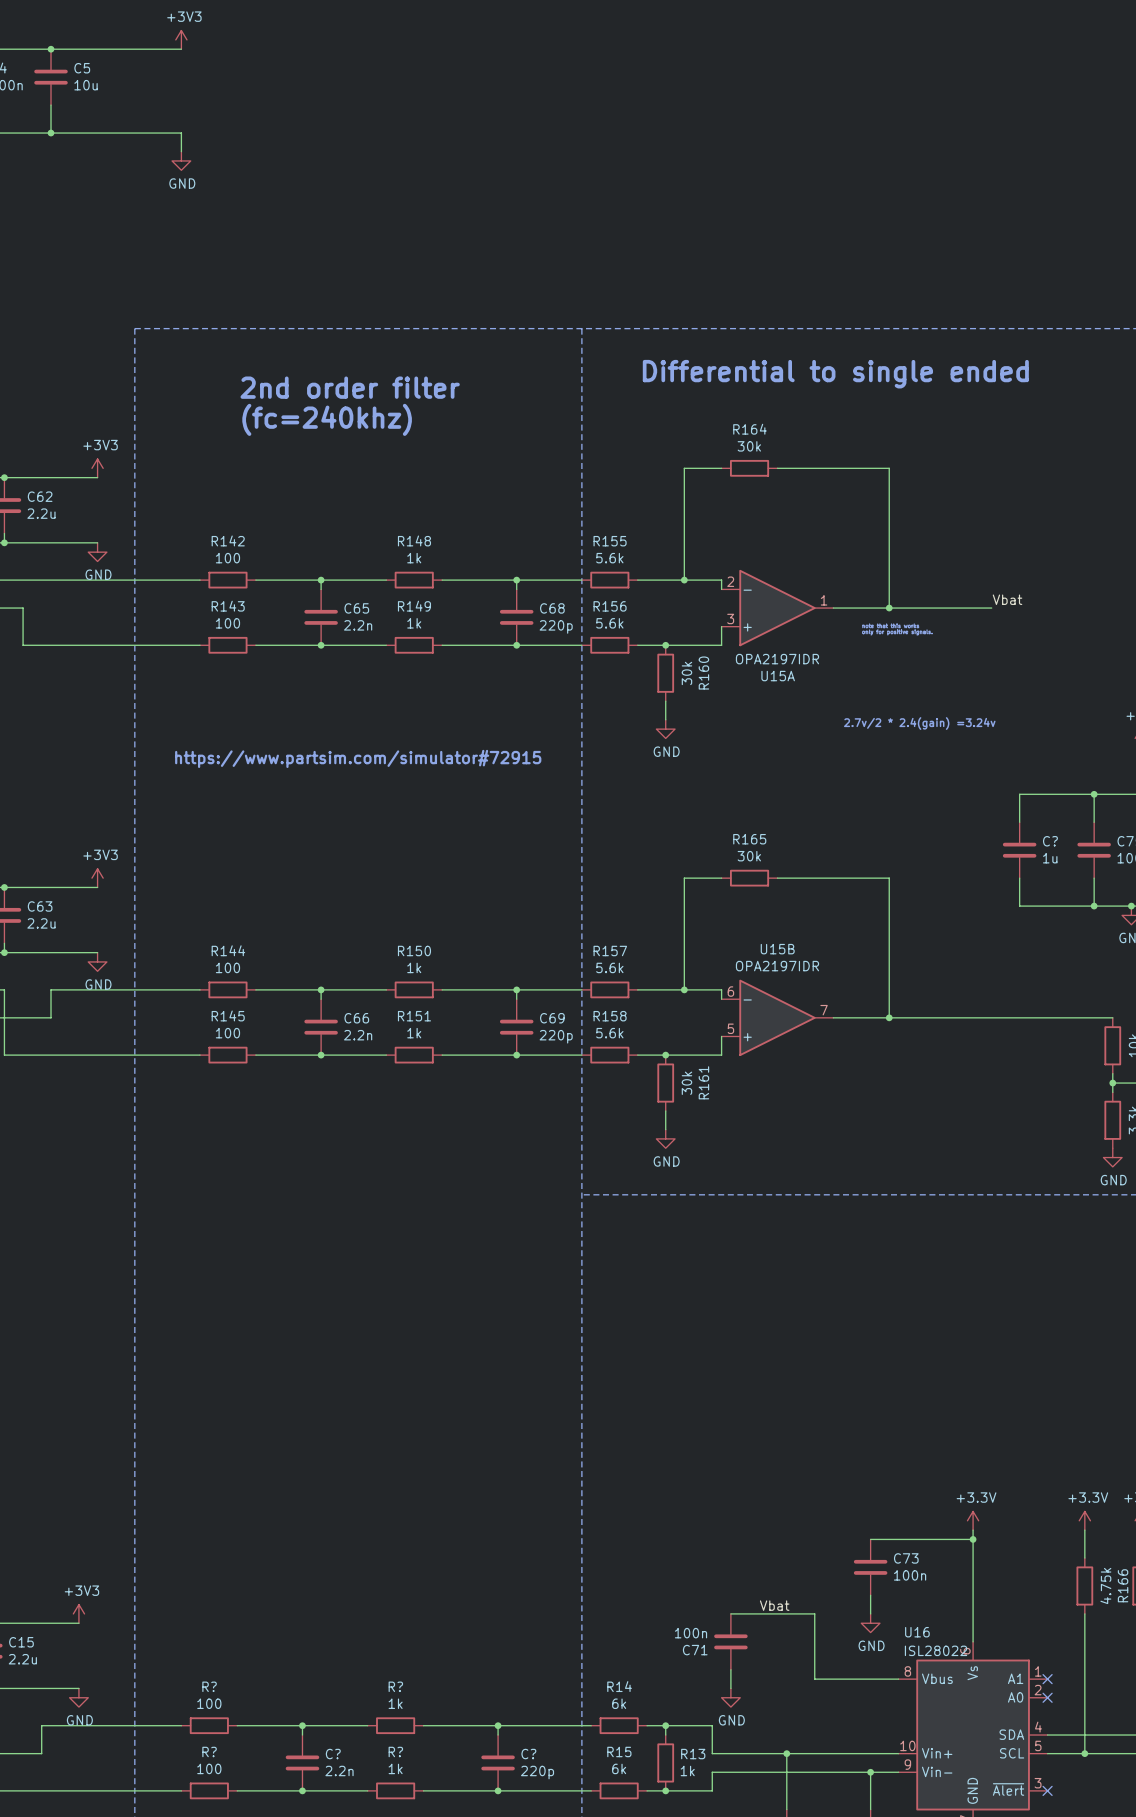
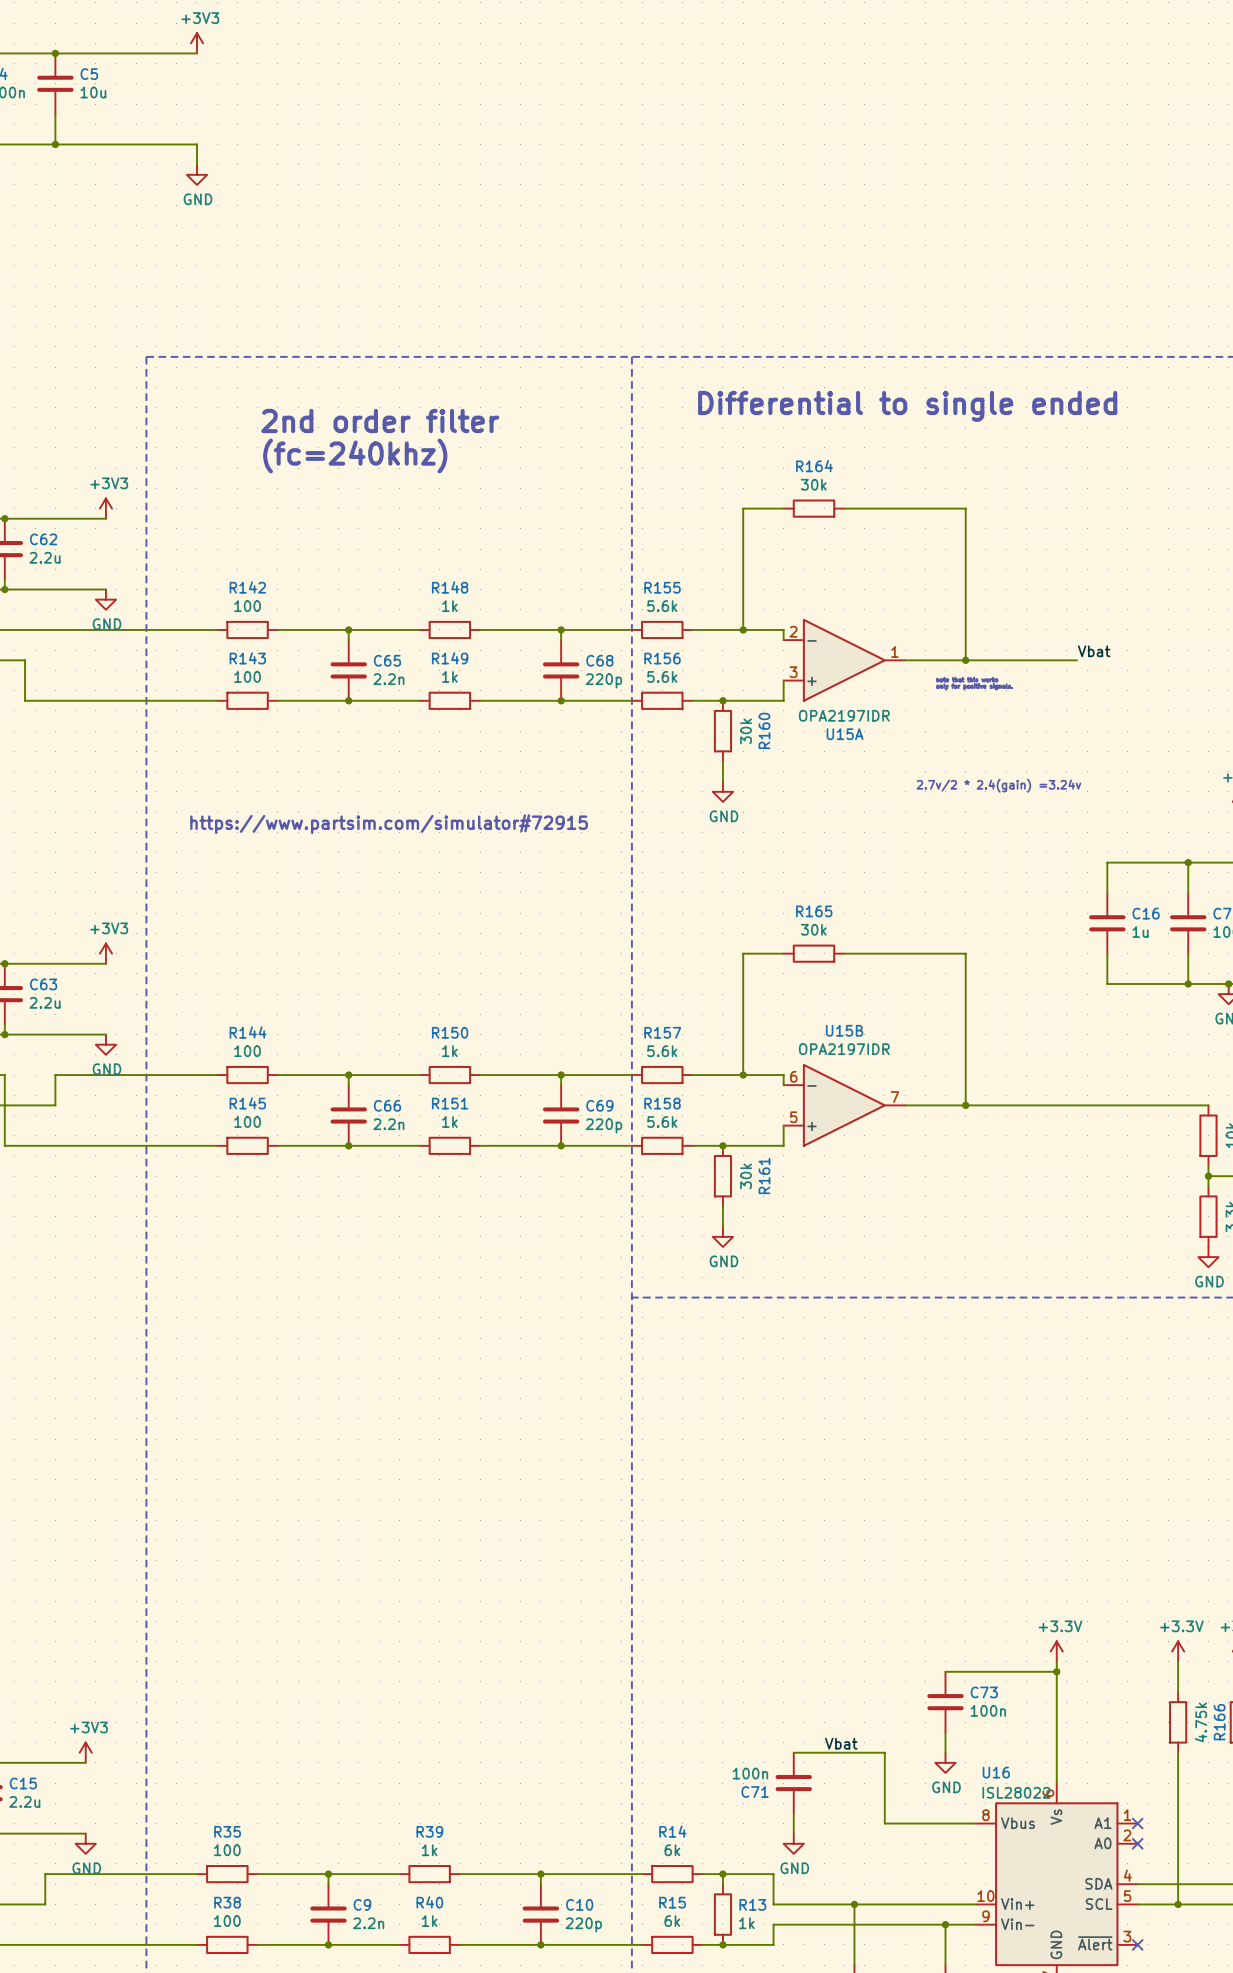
C? name: C? (1050, 841) -> C16 (1146, 913)
R? name: R? (209, 1686) -> R35 (227, 1831)
R? name: R? (395, 1686) -> R39 (429, 1831)
R? name: R? (209, 1751) -> R38 (227, 1902)
R? name: R? (395, 1751) -> R40 (429, 1902)
C? name: C? (333, 1754) -> C9 (362, 1904)
C? name: C? (528, 1754) -> C10 (579, 1904)

